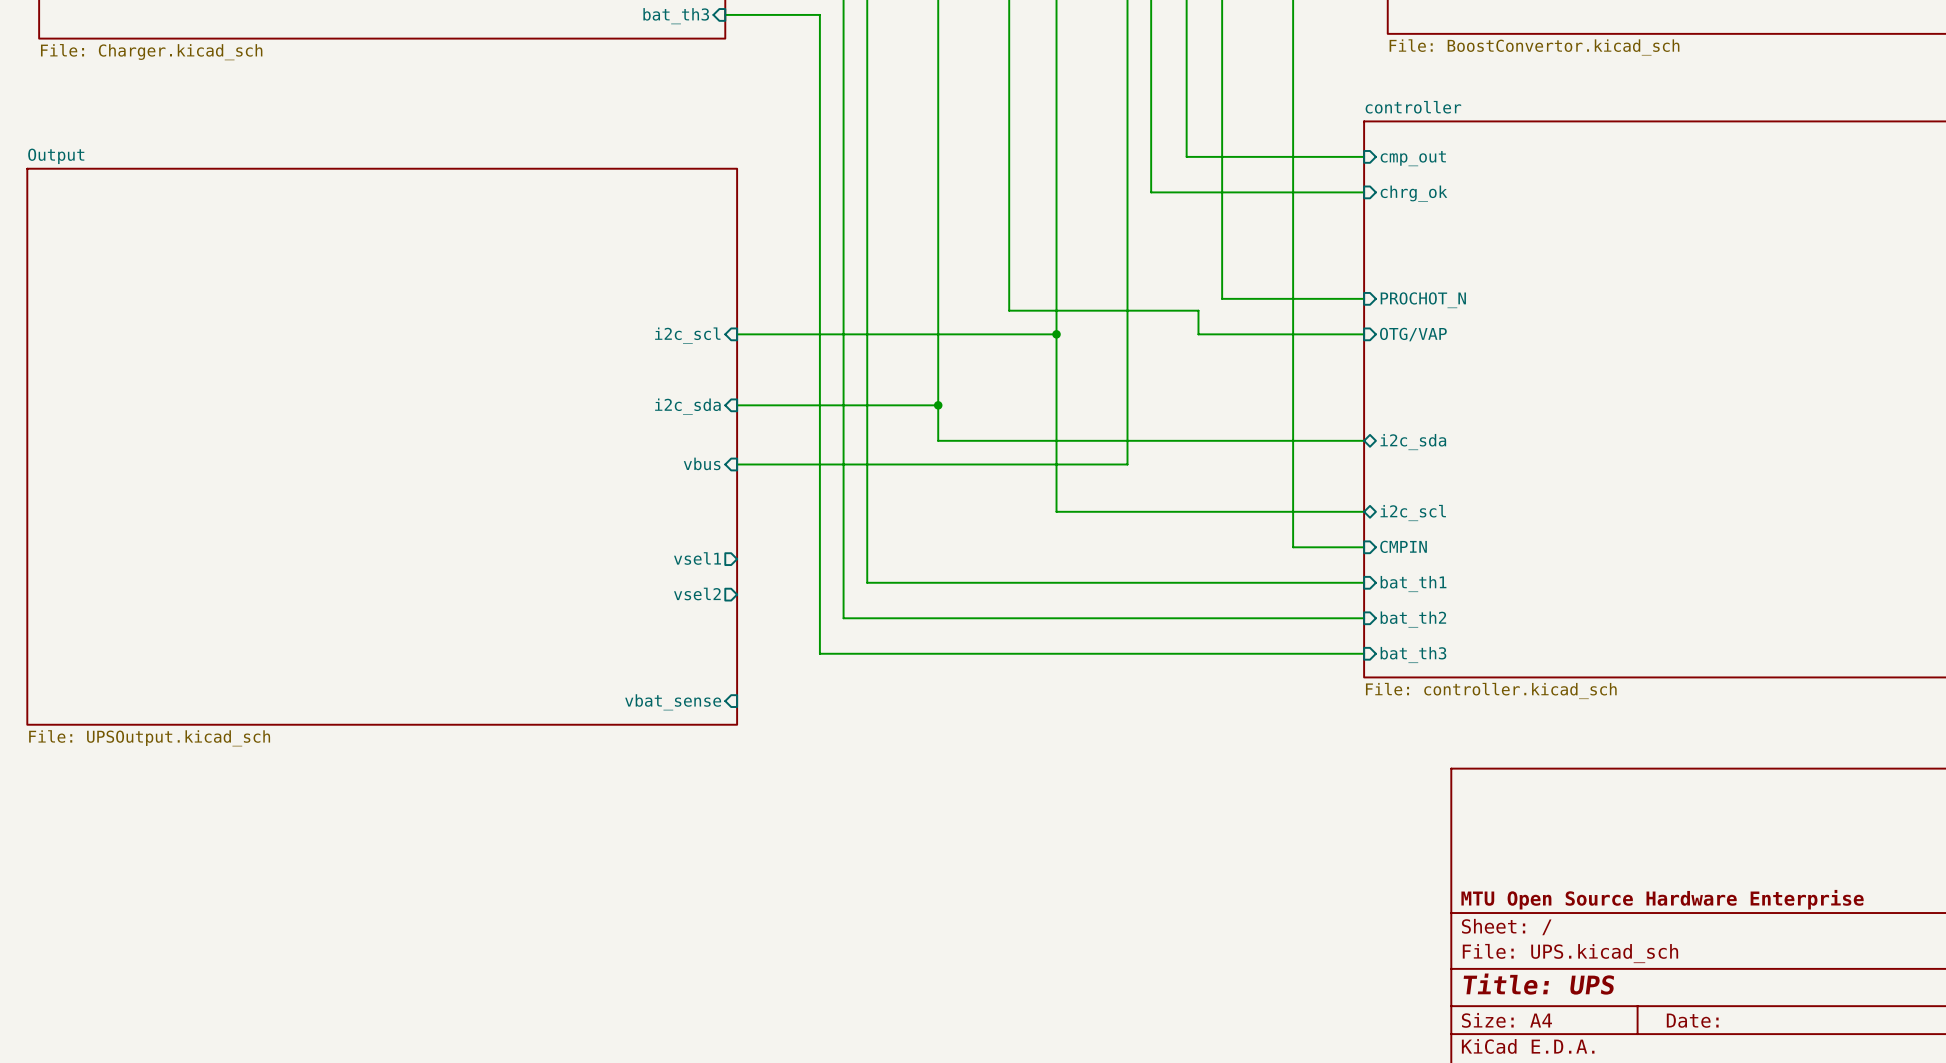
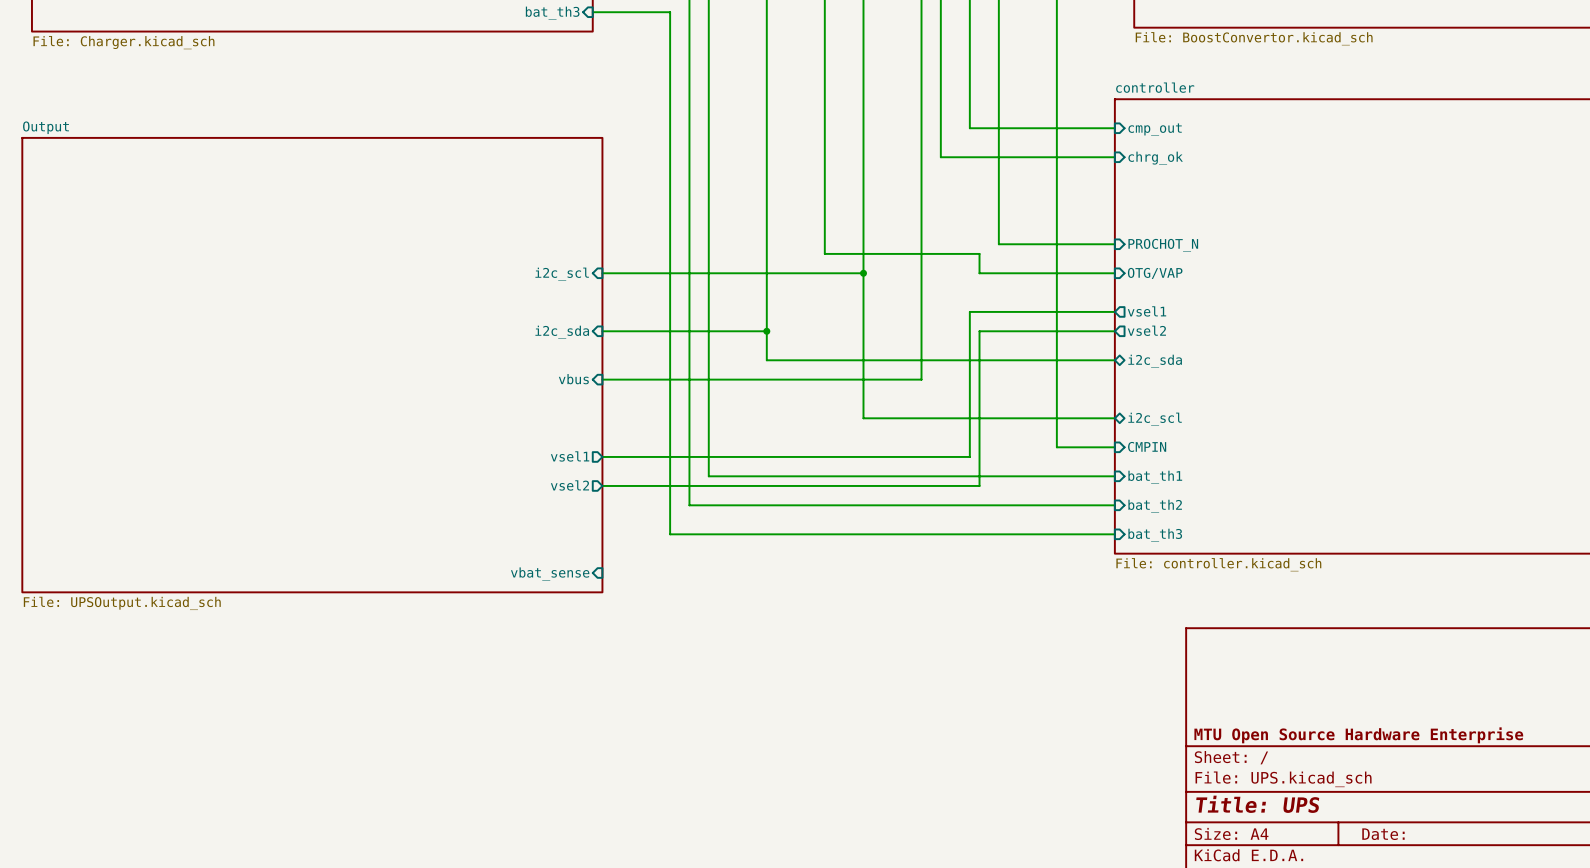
wire: none -> (1114, 311) (969, 311) (969, 456) (602, 456)
sheet pin: none -> vsel1 (1147, 311)
sheet pin: none -> vsel2 (1146, 330)
wire: none -> (1114, 331) (979, 331) (979, 485) (602, 485)

